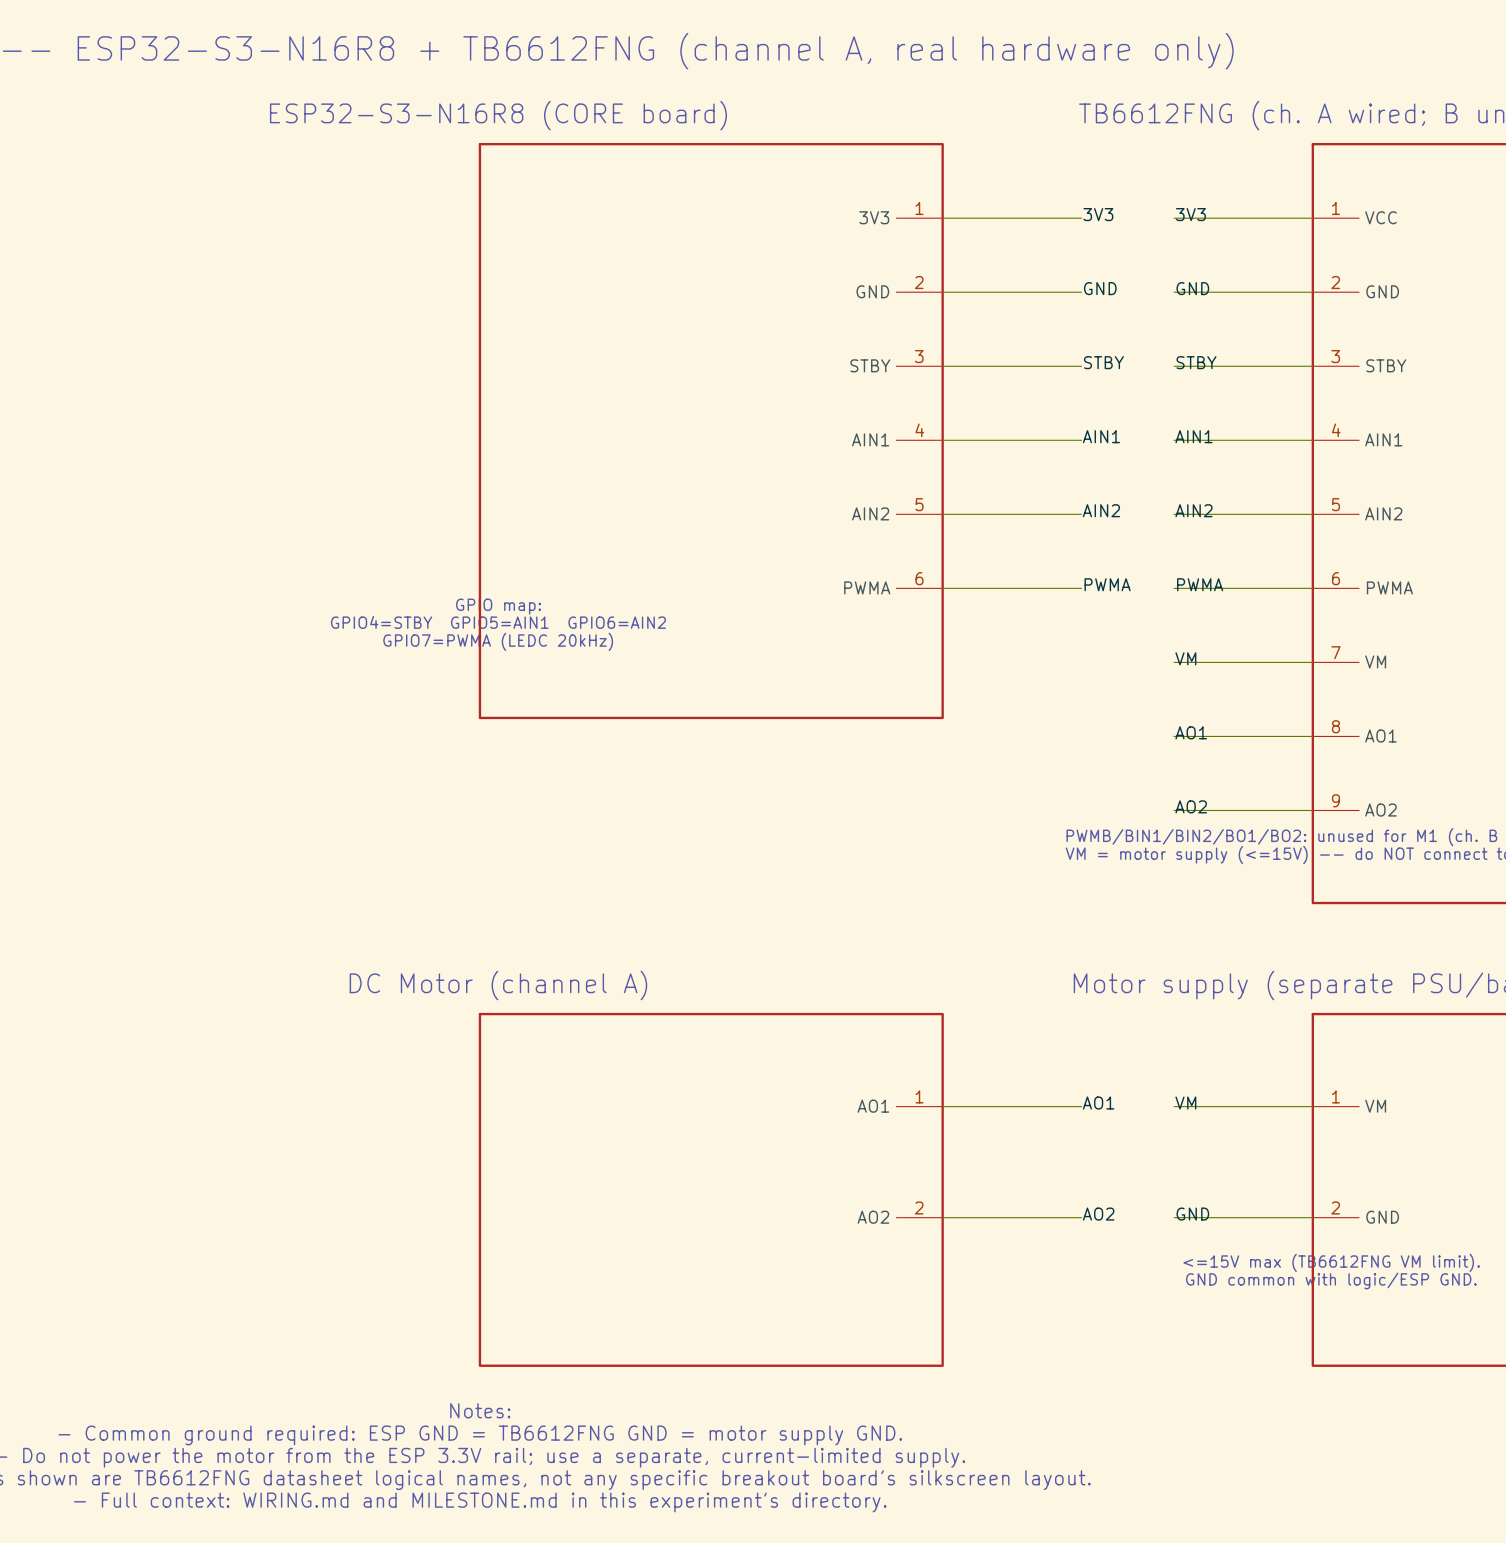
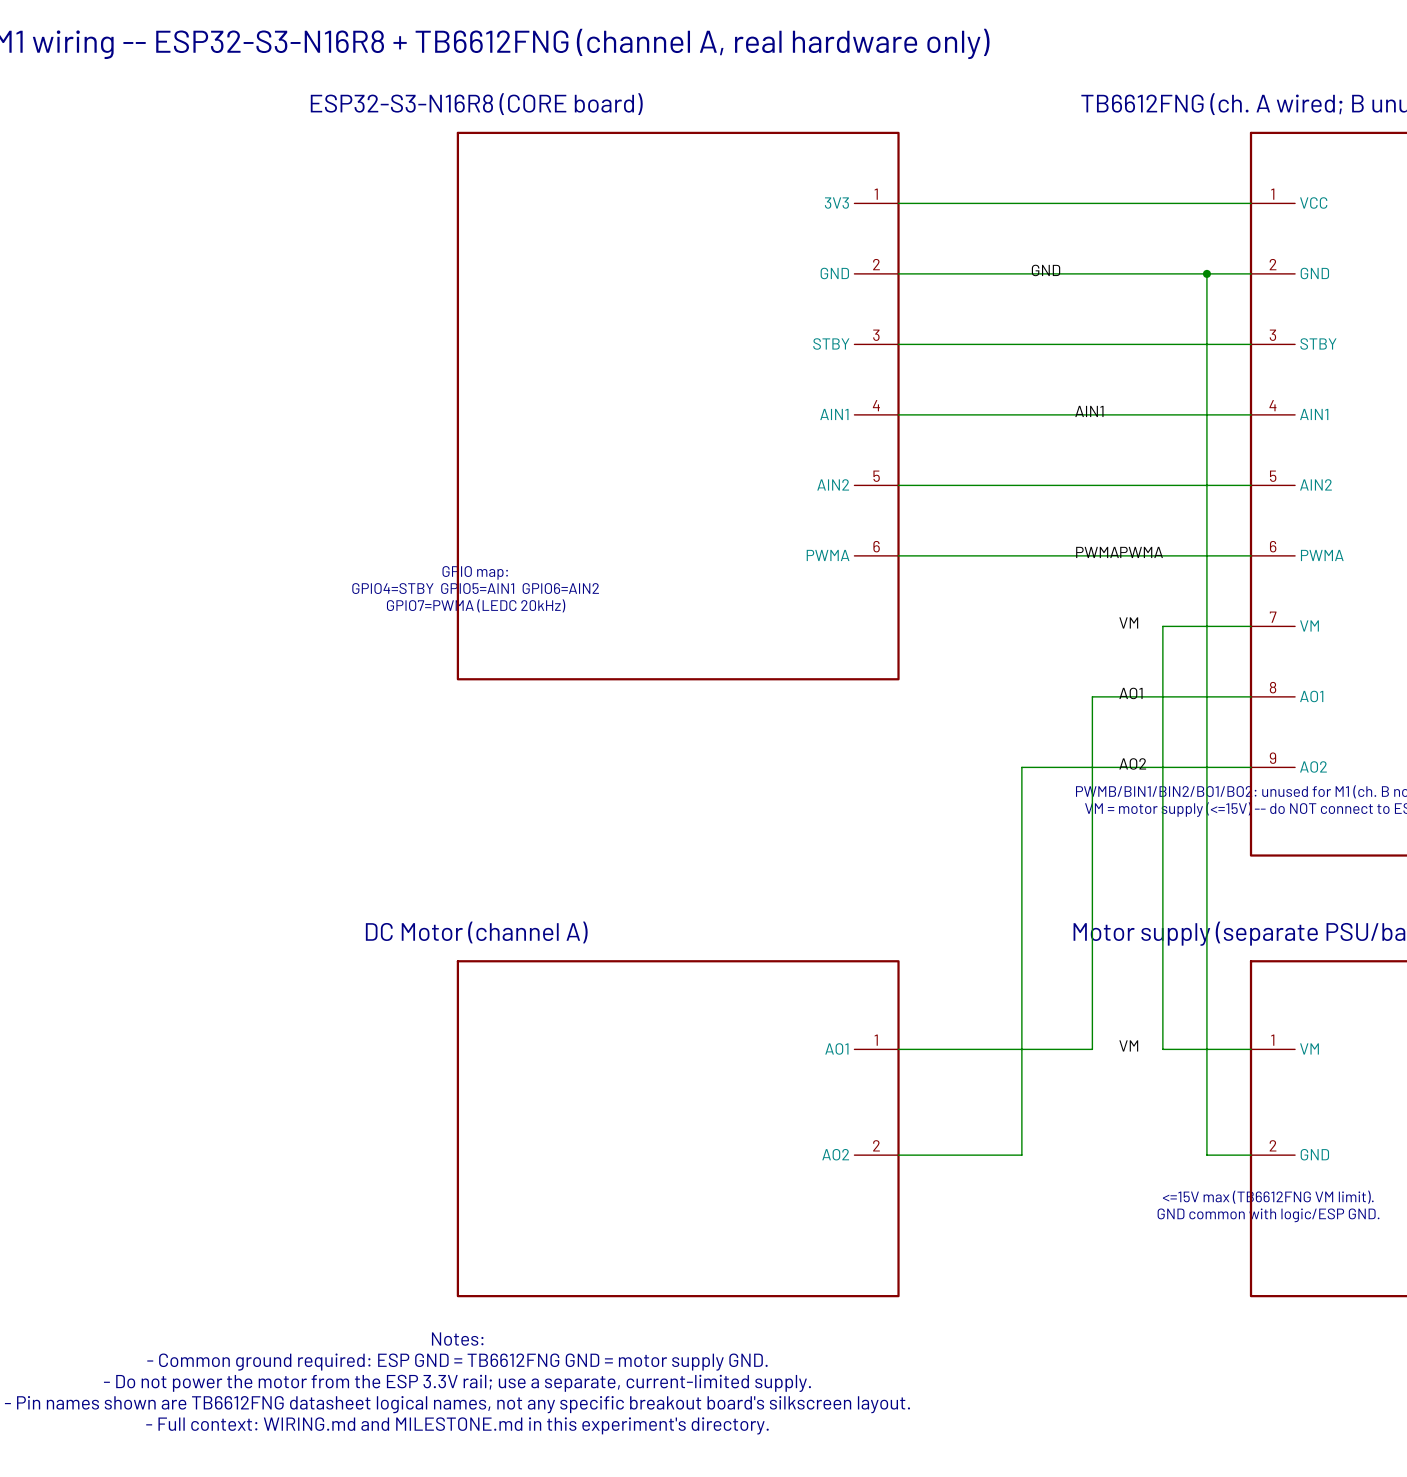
label: 3V3 (1098, 214) -> none
label: 3V3 (1190, 214) -> none
wire: none -> (1030, 203) (1118, 203)
label: GND (1192, 288) -> none
wire: none -> (1030, 273) (1118, 273)
junction: none -> (1206, 273)
label: STBY (1103, 362) -> none
label: STBY (1196, 362) -> none
wire: none -> (1030, 344) (1118, 344)
label: AIN1 (1101, 436) -> none
label: none -> AIN1 (1089, 411)
label: AIN1 (1193, 436) -> none
wire: none -> (1030, 414) (1118, 414)
label: AIN2 (1101, 510) -> none
label: AIN2 (1193, 510) -> none
wire: none -> (1030, 485) (1118, 485)
label position: PWMA (1107, 584) -> PWMA (1097, 552)
wire: none -> (1030, 555) (1118, 555)
wire: (1174, 662) (1220, 662) -> (1162, 1049) (1162, 626)
wire: none -> (1118, 696) (1092, 696) (1092, 1049) (1030, 1049)
label: AO1 (1098, 1103) -> none
wire: (1174, 1106) (1220, 1106) -> none
label: AO2 (1098, 1214) -> none
label: GND (1192, 1214) -> none
wire: (1072, 1217) (1081, 1217) -> (1021, 1155) (1021, 767) (1118, 767)
wire: (1174, 1217) (1266, 1217) -> (1206, 273) (1206, 1155)

